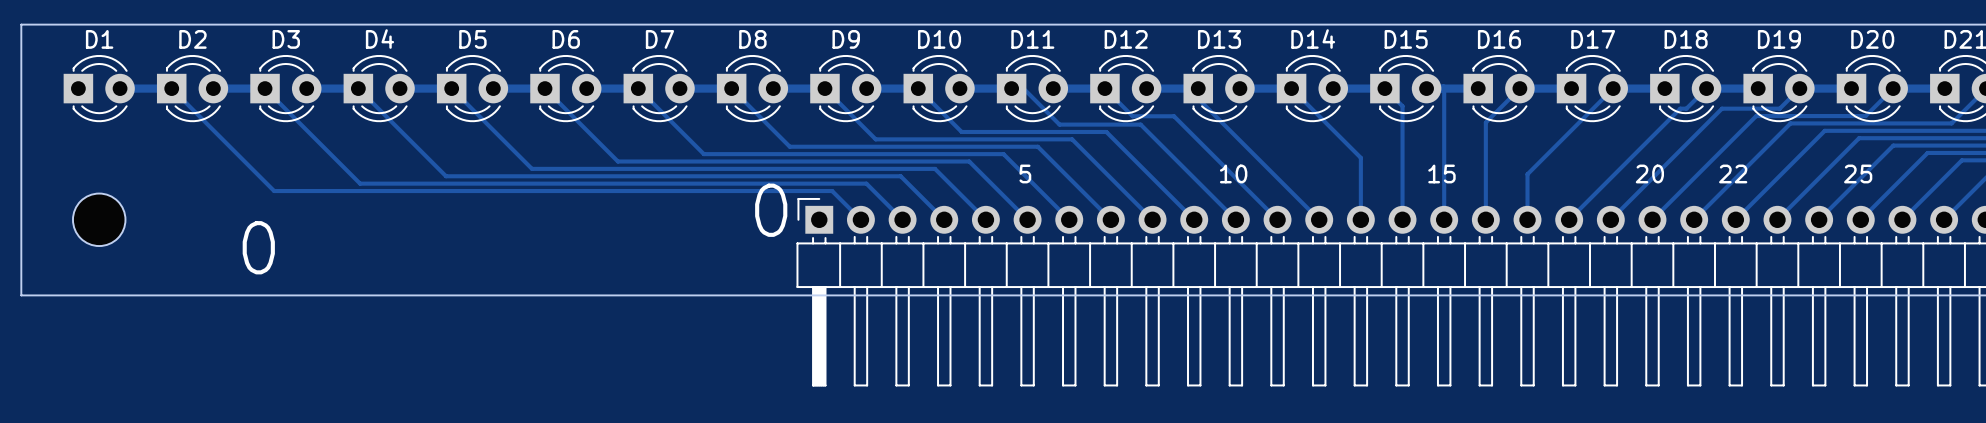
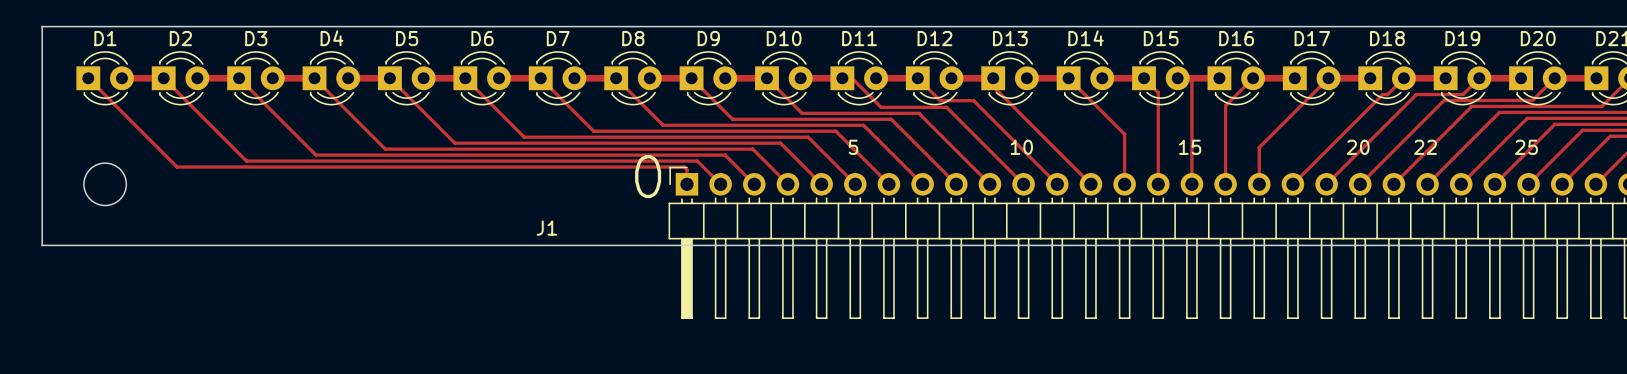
track: none -> (88, 78) (177, 167) (684, 167) (686, 169) (686, 184)
text: 0 (258, 247) -> none
J1 name: none -> J1 (546, 228)

